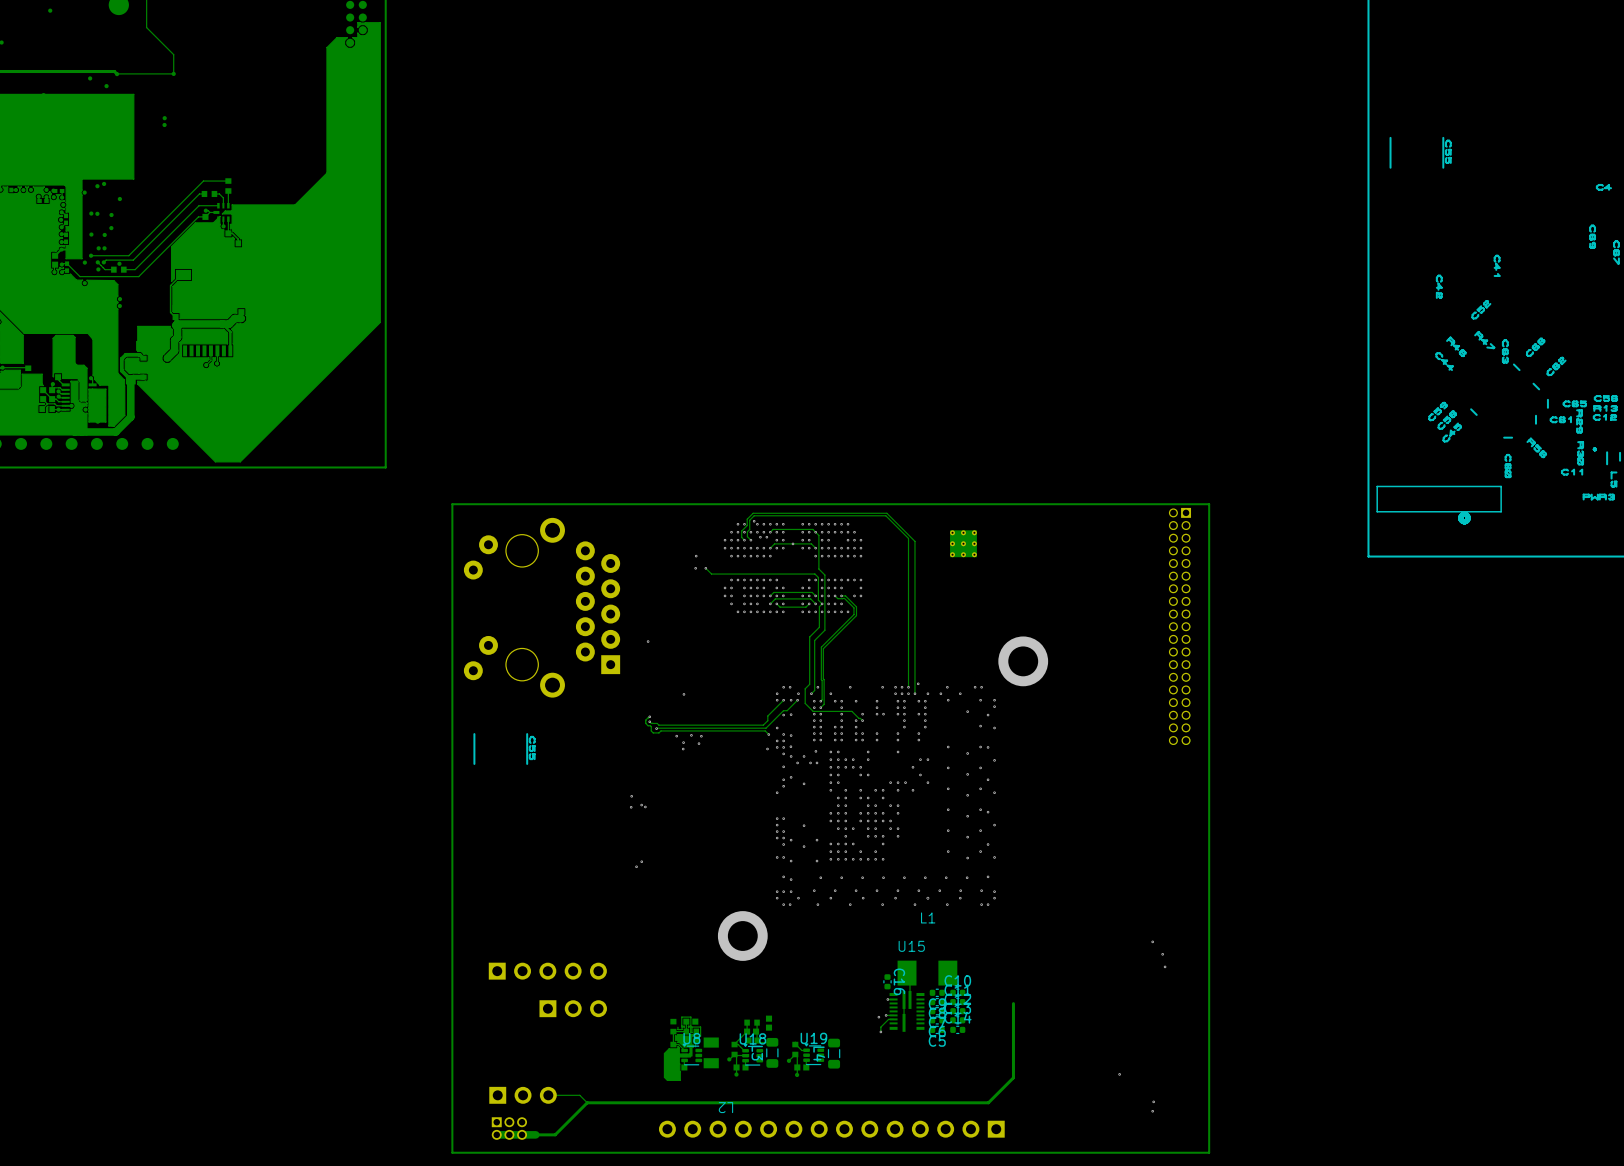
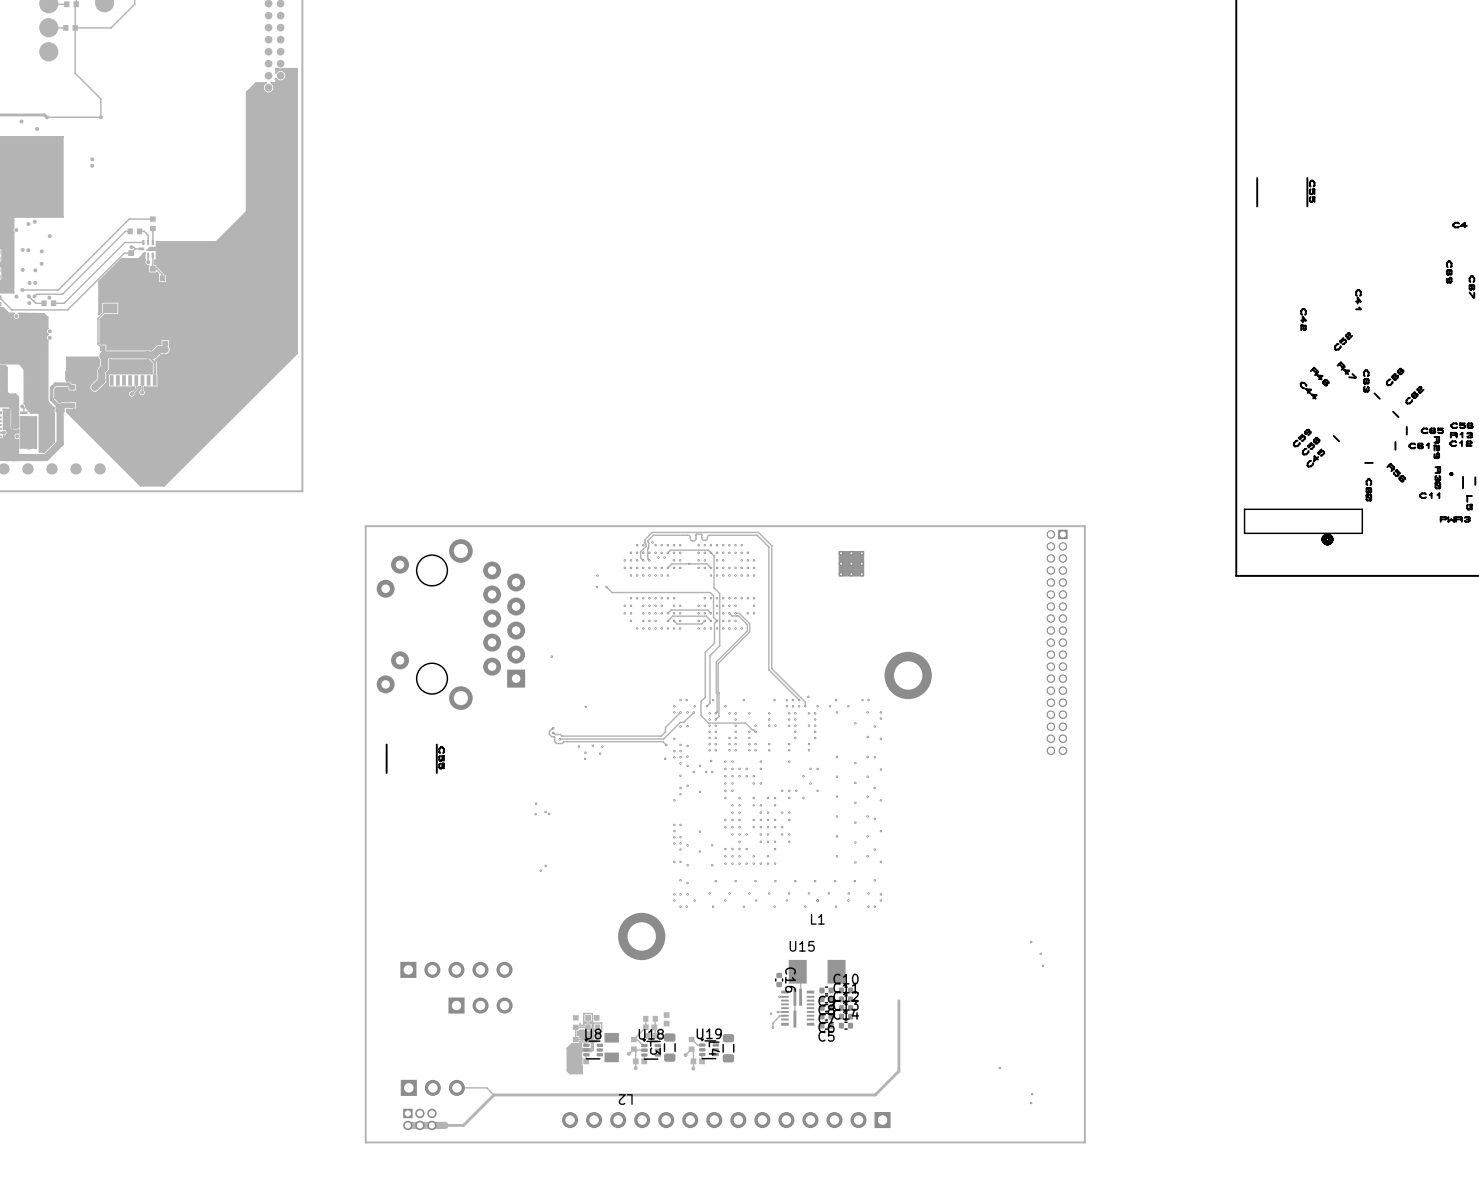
track: (747, 523) (747, 519) (753, 513) (886, 513) (914, 541) (914, 689) -> (645, 544) (644, 539) (652, 532) (758, 532) (771, 545) (771, 668) (805, 702)
track: (749, 538) (747, 531) (749, 529) (749, 520) (754, 515) (885, 515) (908, 538) (908, 687) -> (647, 558) (647, 540) (653, 535) (688, 535) (692, 540) (695, 539) (696, 534) (701, 534) (704, 540) (709, 535) (757, 535) (768, 546) (768, 669) (799, 700)

